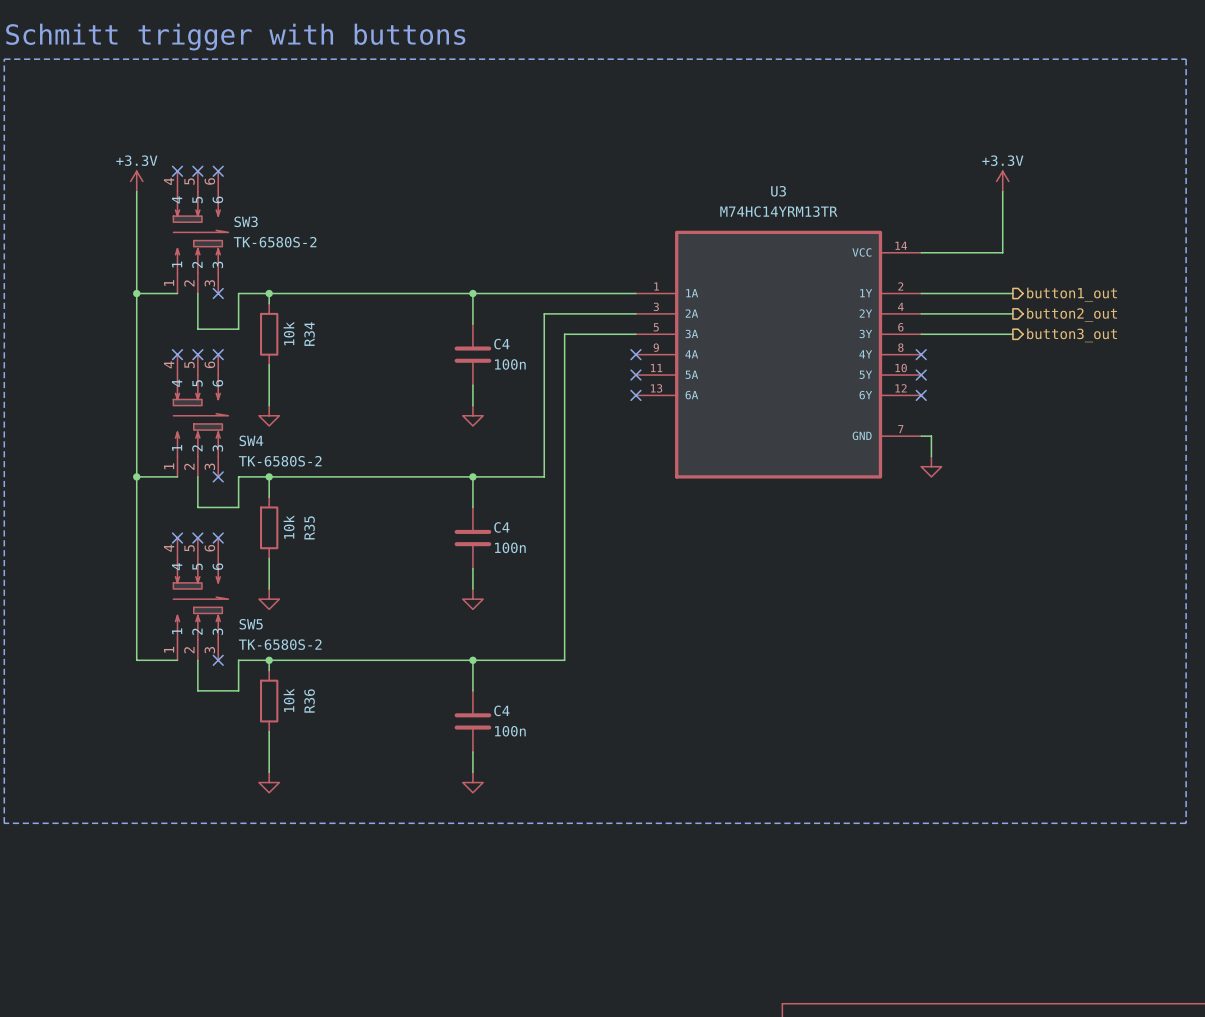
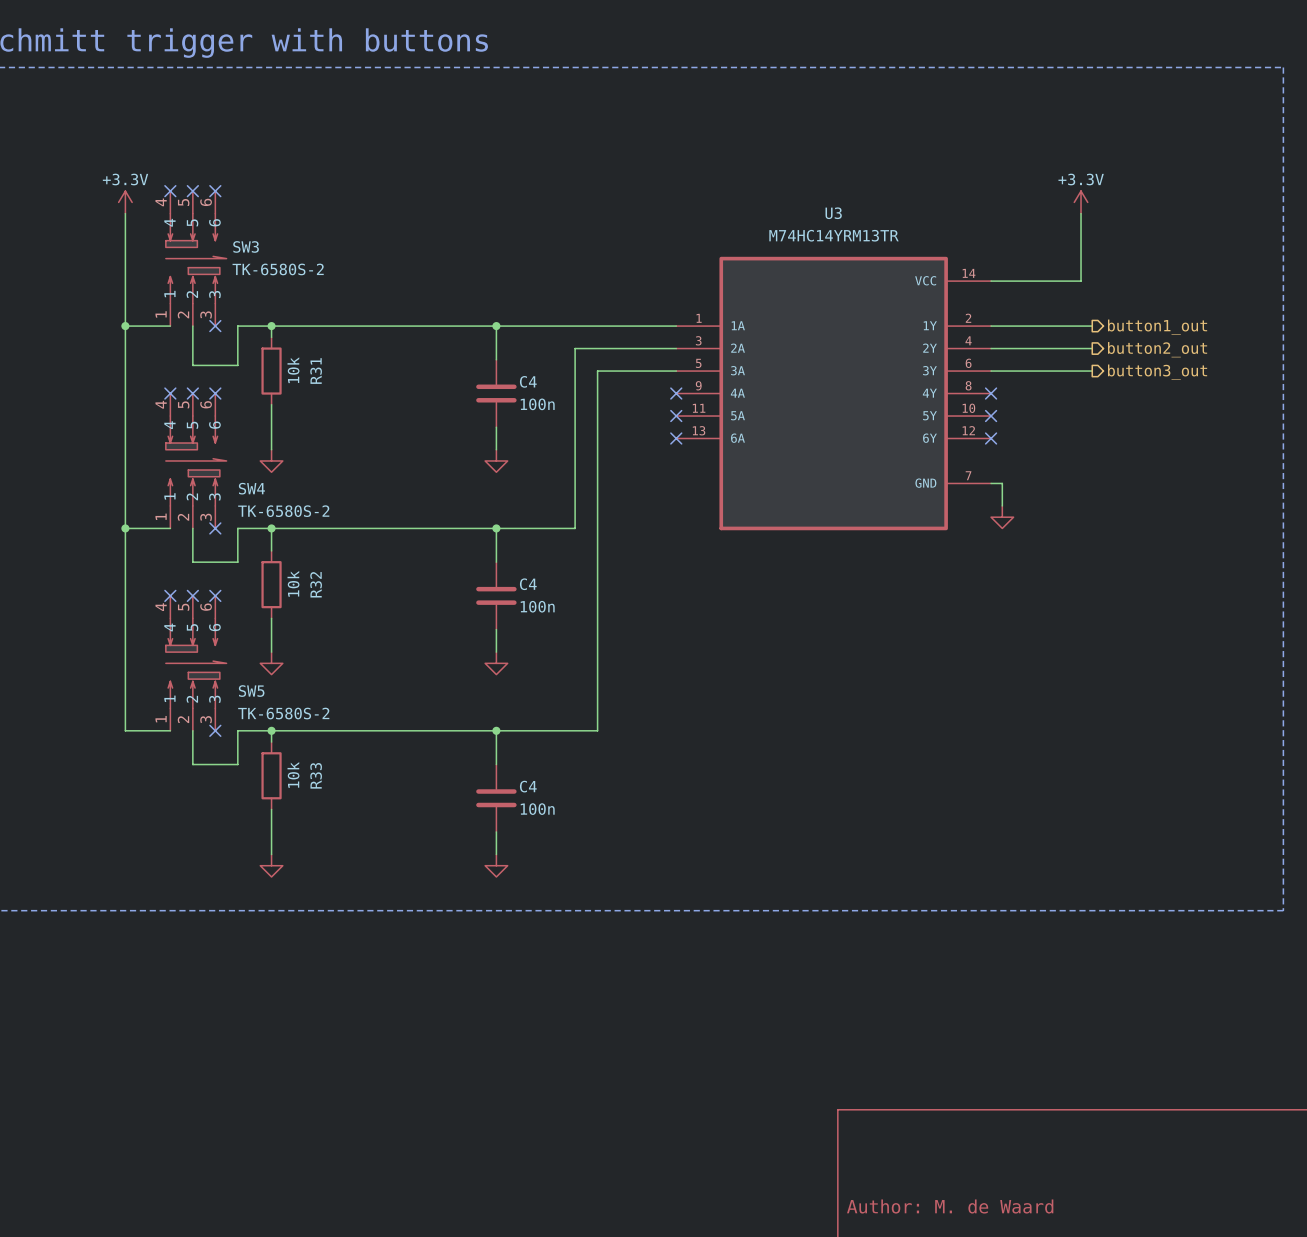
R34 name: R34 (309, 334) -> R31 (316, 371)
R35 name: R35 (309, 527) -> R32 (316, 584)
R36 name: R36 (309, 701) -> R33 (316, 775)

